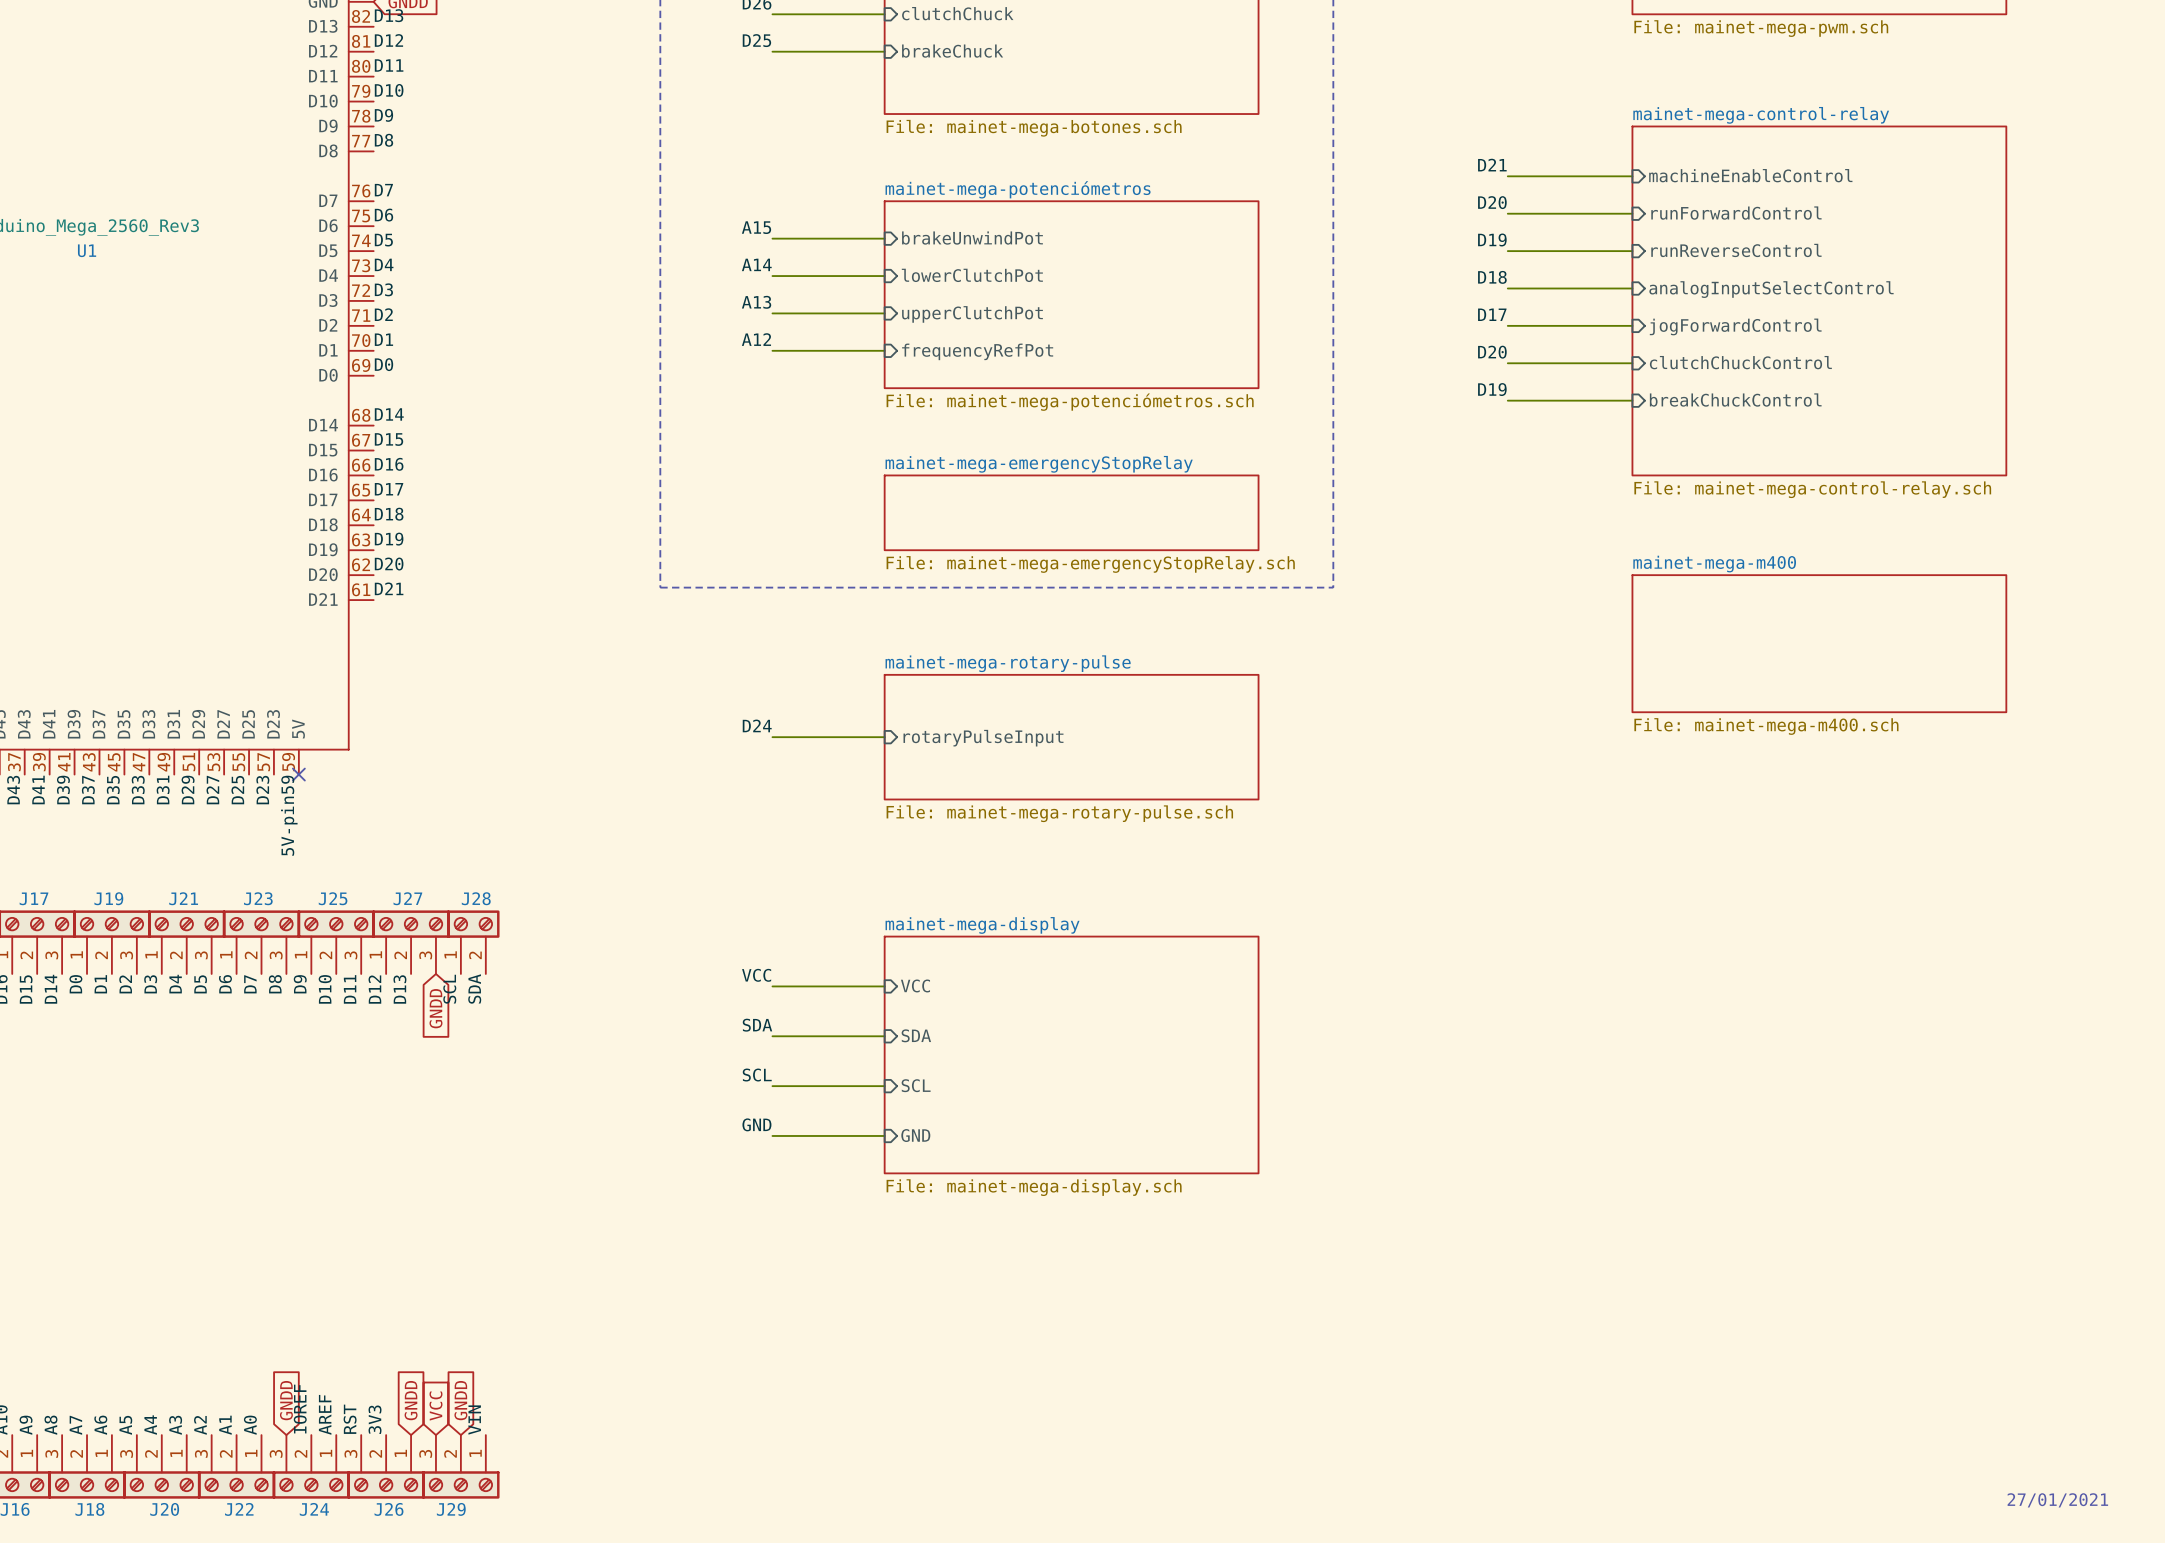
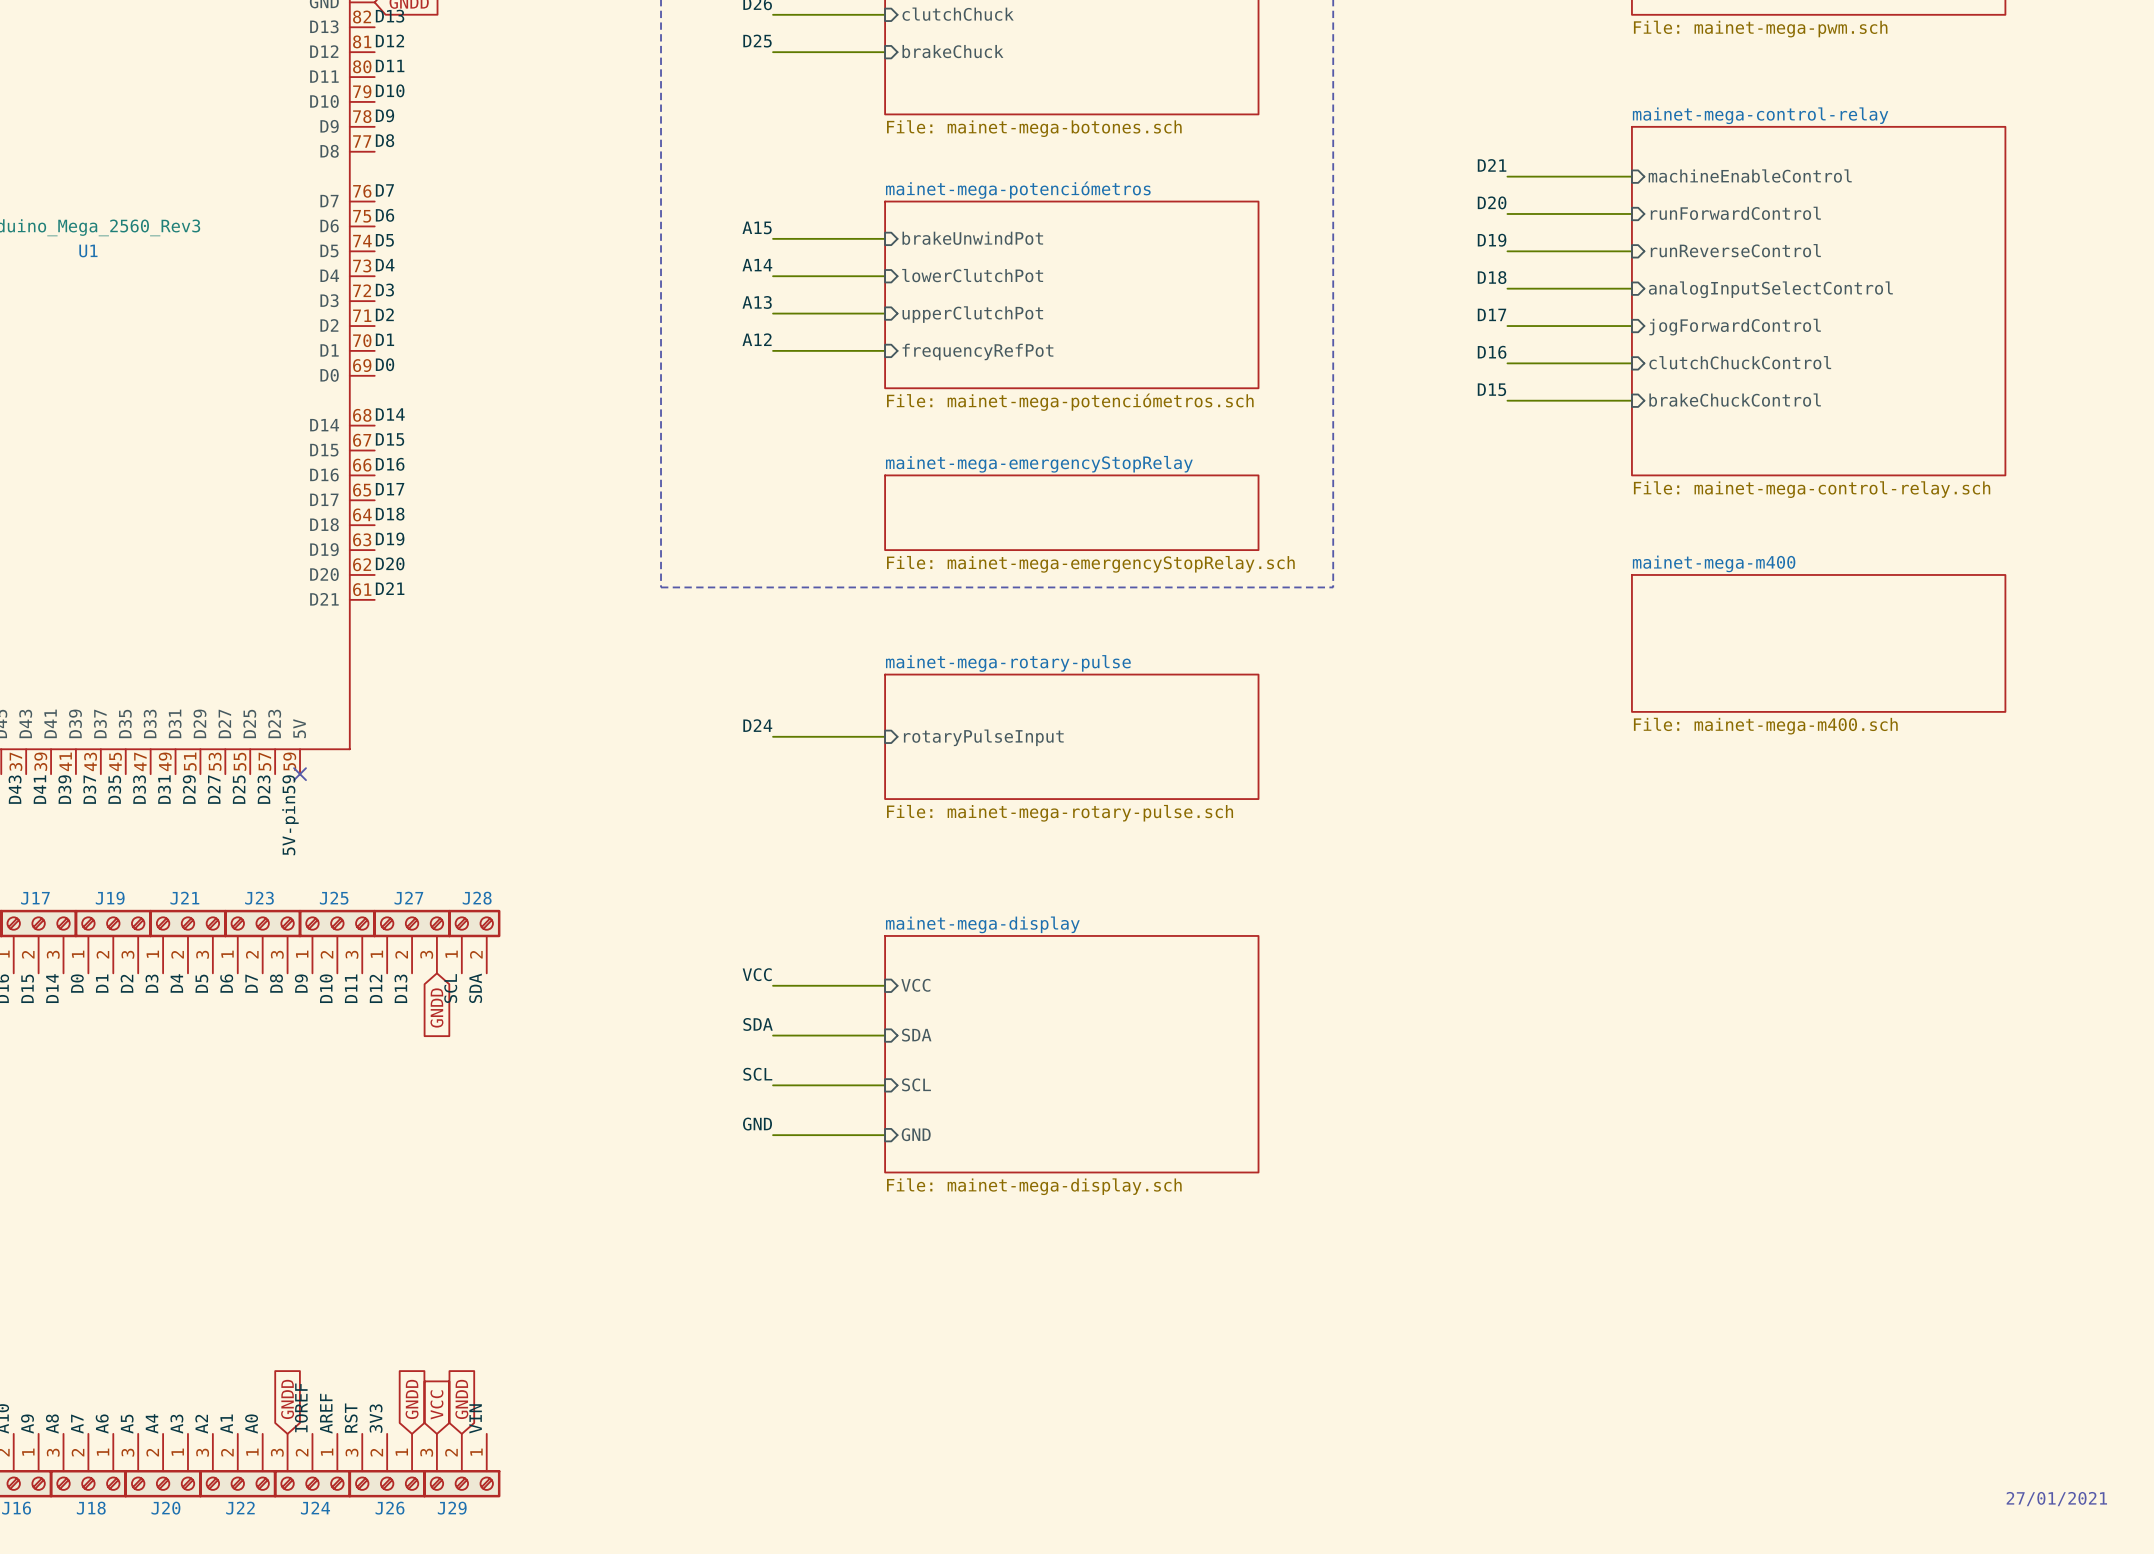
label: D20 (1492, 352) -> D16 (1492, 352)
label: D19 (1492, 389) -> D15 (1491, 389)
sheet pin: breakChuckControl (1735, 400) -> brakeChuckControl (1735, 400)

